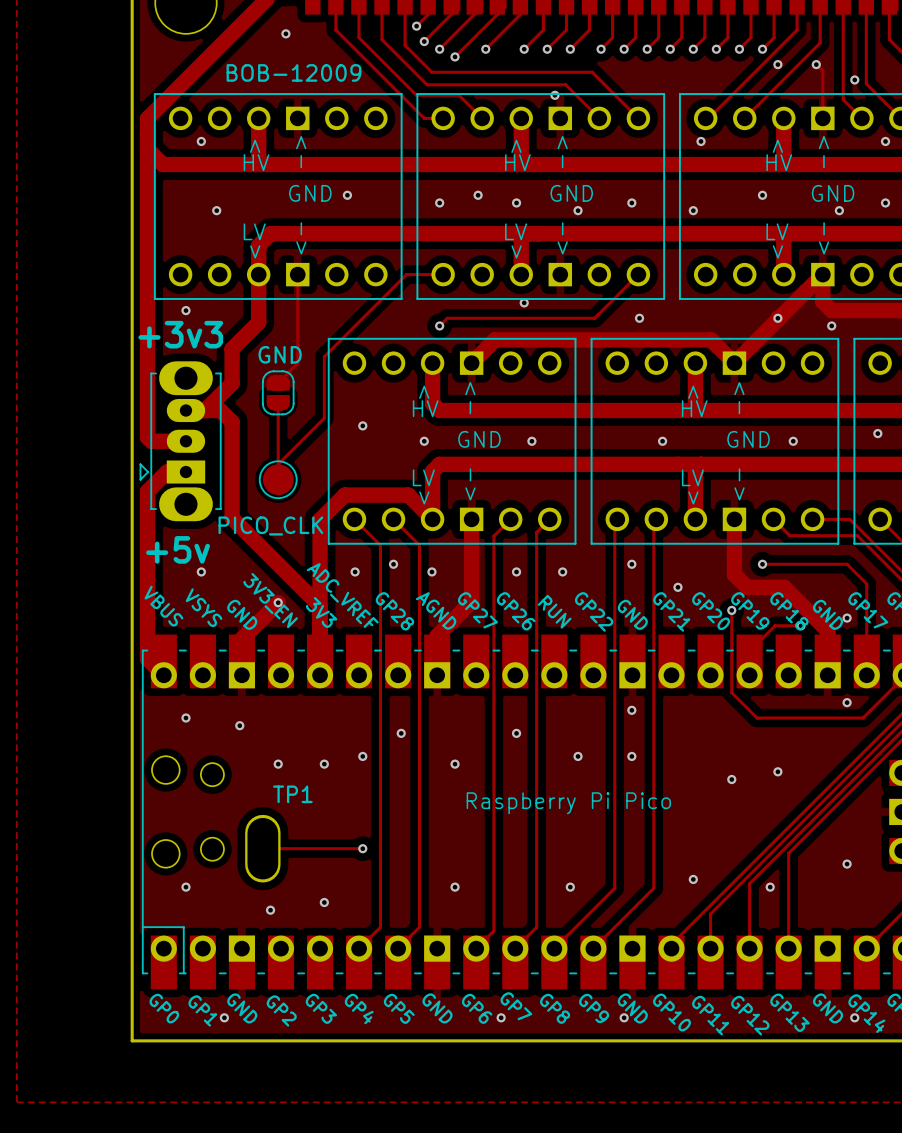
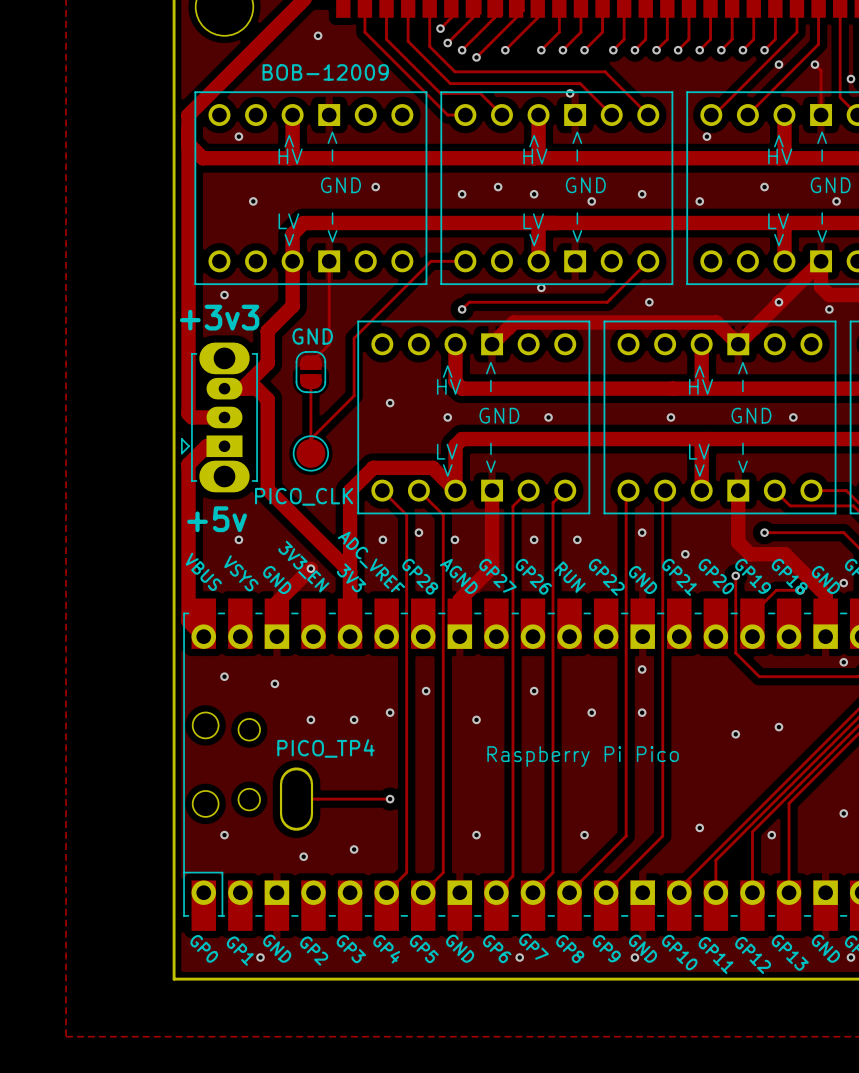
TP1 name: TP1 (292, 794) -> PICO_TP4 (326, 748)

